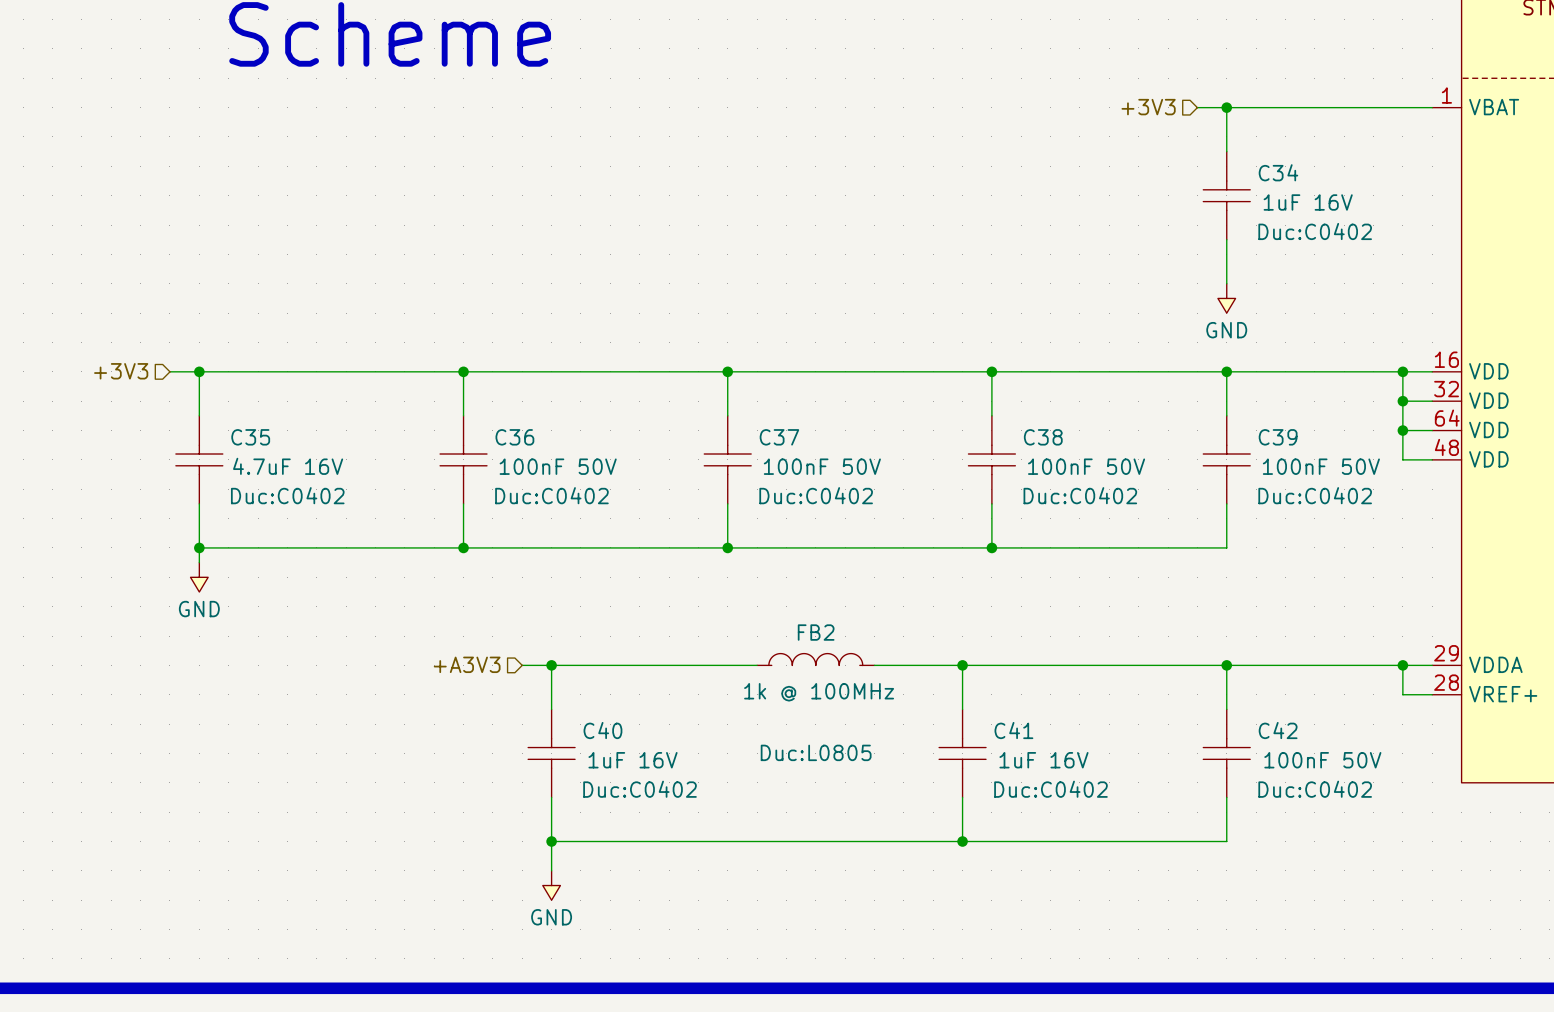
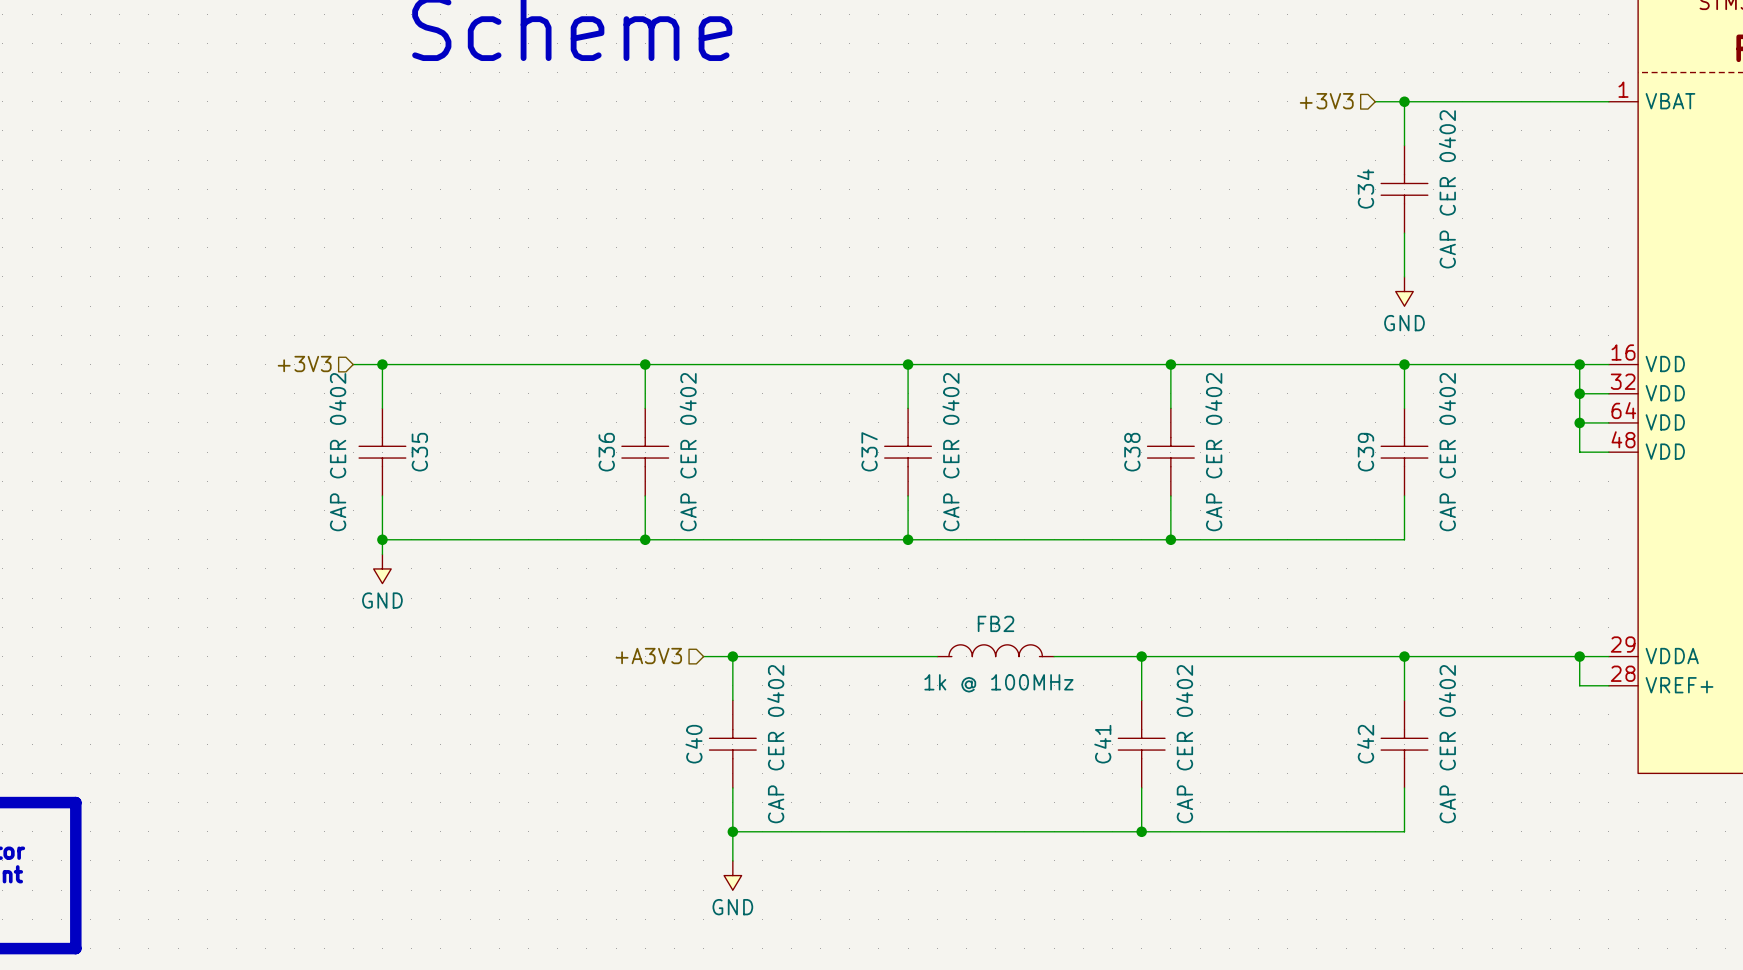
C34 name rotation: 0° (1278, 172) -> 90° counterclockwise (1365, 189)
C34 name position: C34 (1278, 172) -> C34 (1365, 189)
C34 value: 1uF 16V (1308, 202) -> CAP CER 0402 (1447, 189)
C34 text: Duc:C0402 (1315, 231) -> none
C35 name rotation: 0° (250, 437) -> 90° counterclockwise (419, 452)
C36 name rotation: 0° (514, 437) -> 90° counterclockwise (606, 452)
C36 name position: C36 (514, 437) -> C36 (606, 452)
C37 name rotation: 0° (779, 437) -> 90° counterclockwise (869, 451)
C37 name position: C37 (779, 437) -> C37 (869, 451)
C38 name rotation: 0° (1043, 437) -> 90° counterclockwise (1132, 452)
C38 name position: C38 (1043, 437) -> C38 (1132, 452)
C39 name rotation: 0° (1278, 437) -> 90° counterclockwise (1365, 452)
C39 name position: C39 (1278, 437) -> C39 (1365, 452)
C35 value: 4.7uF 16V (288, 466) -> CAP CER 0402 (337, 452)
C36 value: 100nF 50V (558, 466) -> CAP CER 0402 (688, 452)
C37 value: 100nF 50V (822, 466) -> CAP CER 0402 (950, 452)
C38 value: 100nF 50V (1086, 466) -> CAP CER 0402 (1213, 452)
C39 value: 100nF 50V (1321, 466) -> CAP CER 0402 (1447, 452)
C35 text: Duc:C0402 (287, 495) -> none
C36 text: Duc:C0402 (551, 495) -> none
C37 text: Duc:C0402 (816, 495) -> none
C38 text: Duc:C0402 (1080, 495) -> none
C39 text: Duc:C0402 (1315, 495) -> none
C40 name rotation: 0° (602, 730) -> 90° counterclockwise (693, 744)
C40 name position: C40 (602, 730) -> C40 (693, 744)
C41 name rotation: 0° (1013, 730) -> 90° counterclockwise (1102, 744)
C41 name position: C41 (1013, 730) -> C41 (1102, 744)
C42 name rotation: 0° (1278, 730) -> 90° counterclockwise (1365, 744)
C42 name position: C42 (1278, 730) -> C42 (1365, 744)
FB2 text: Duc:L0805 (816, 752) -> none
C40 value: 1uF 16V (633, 760) -> CAP CER 0402 (775, 744)
C41 value: 1uF 16V (1043, 760) -> CAP CER 0402 (1184, 744)
C42 value: 100nF 50V (1322, 760) -> CAP CER 0402 (1447, 744)
C40 text: Duc:C0402 (640, 789) -> none
C41 text: Duc:C0402 (1050, 789) -> none
C42 text: Duc:C0402 (1315, 789) -> none

